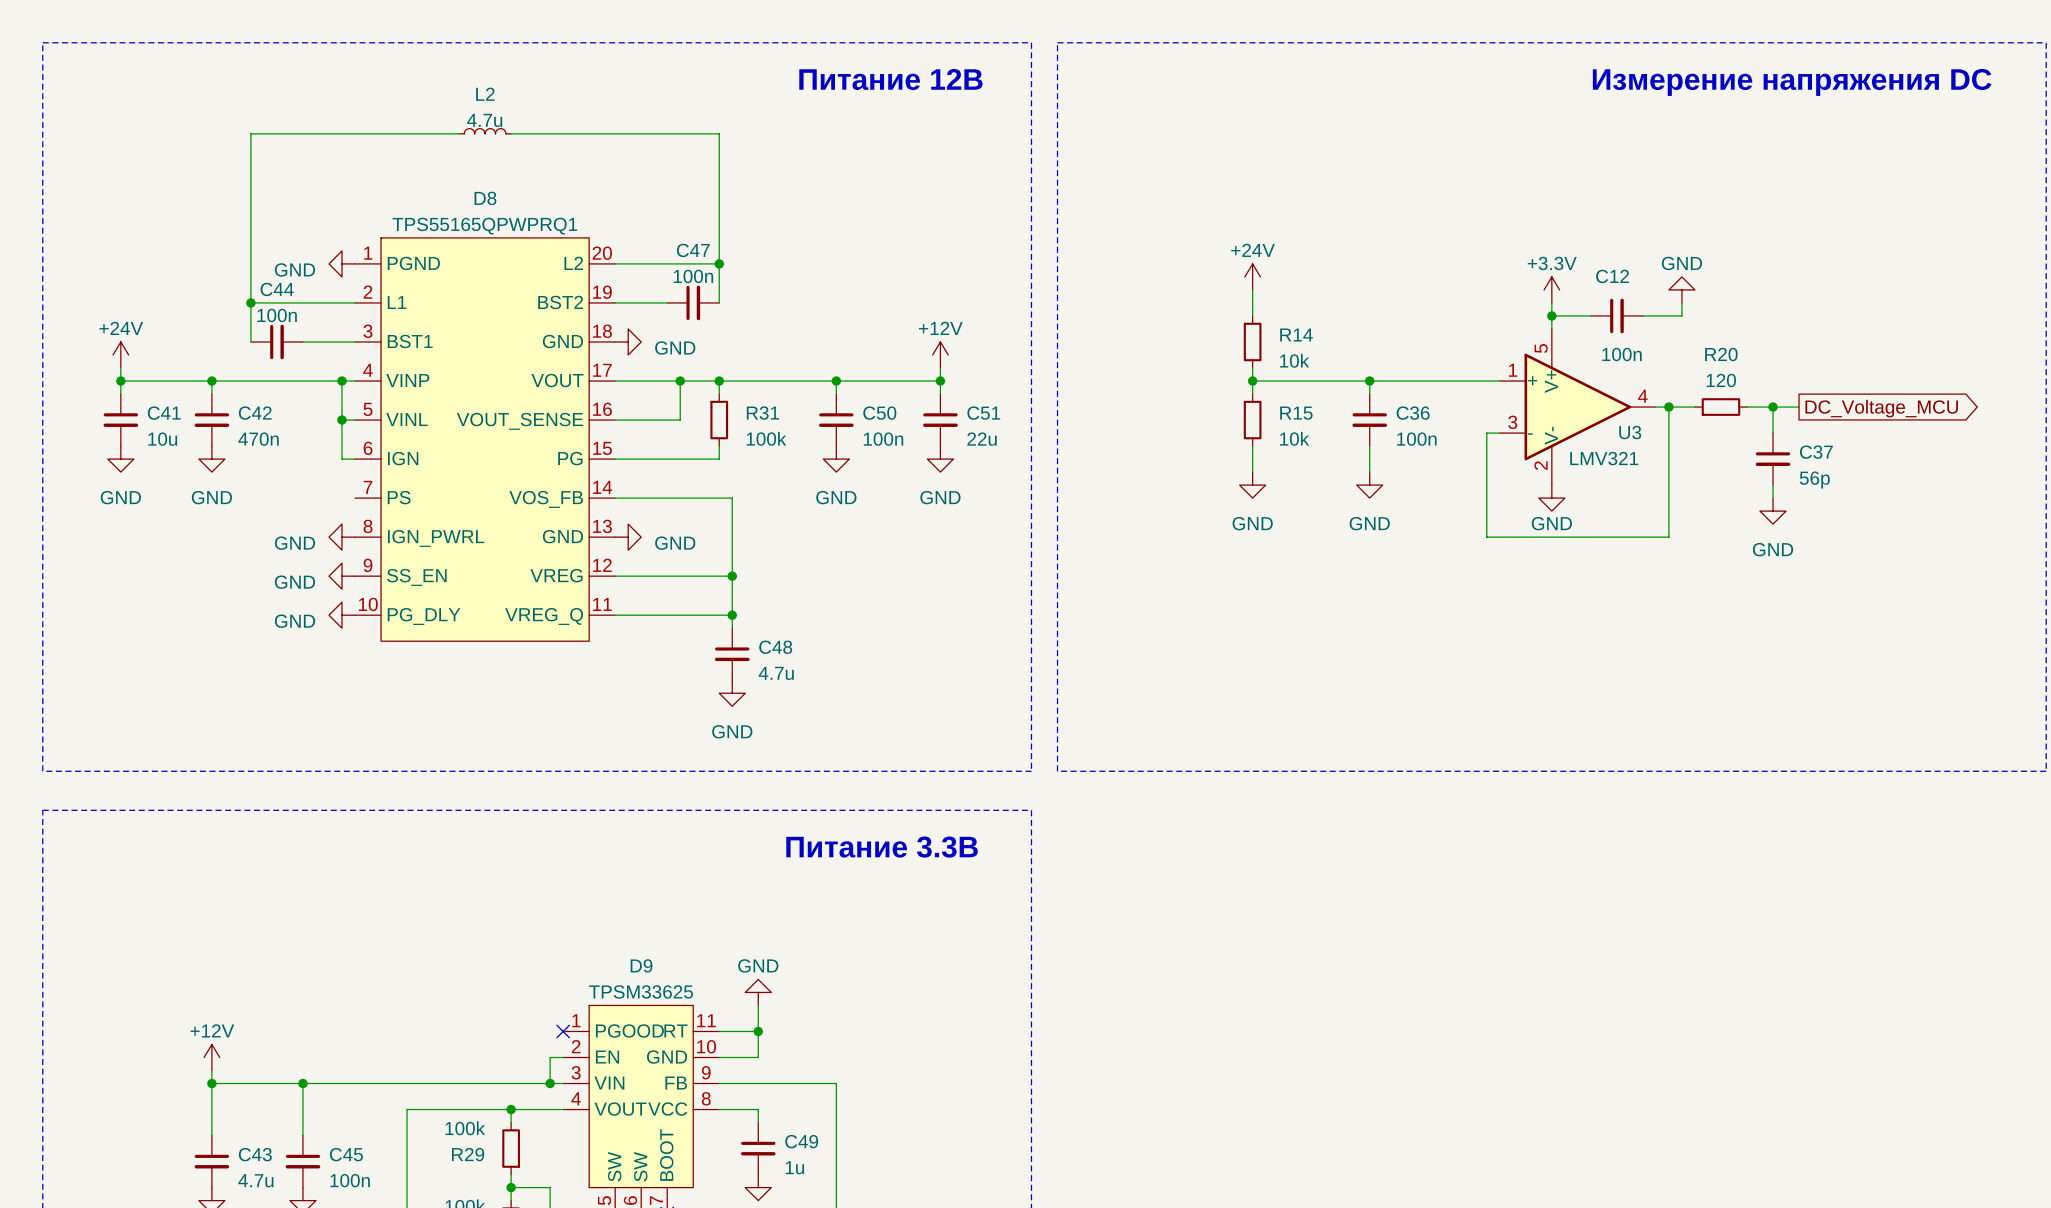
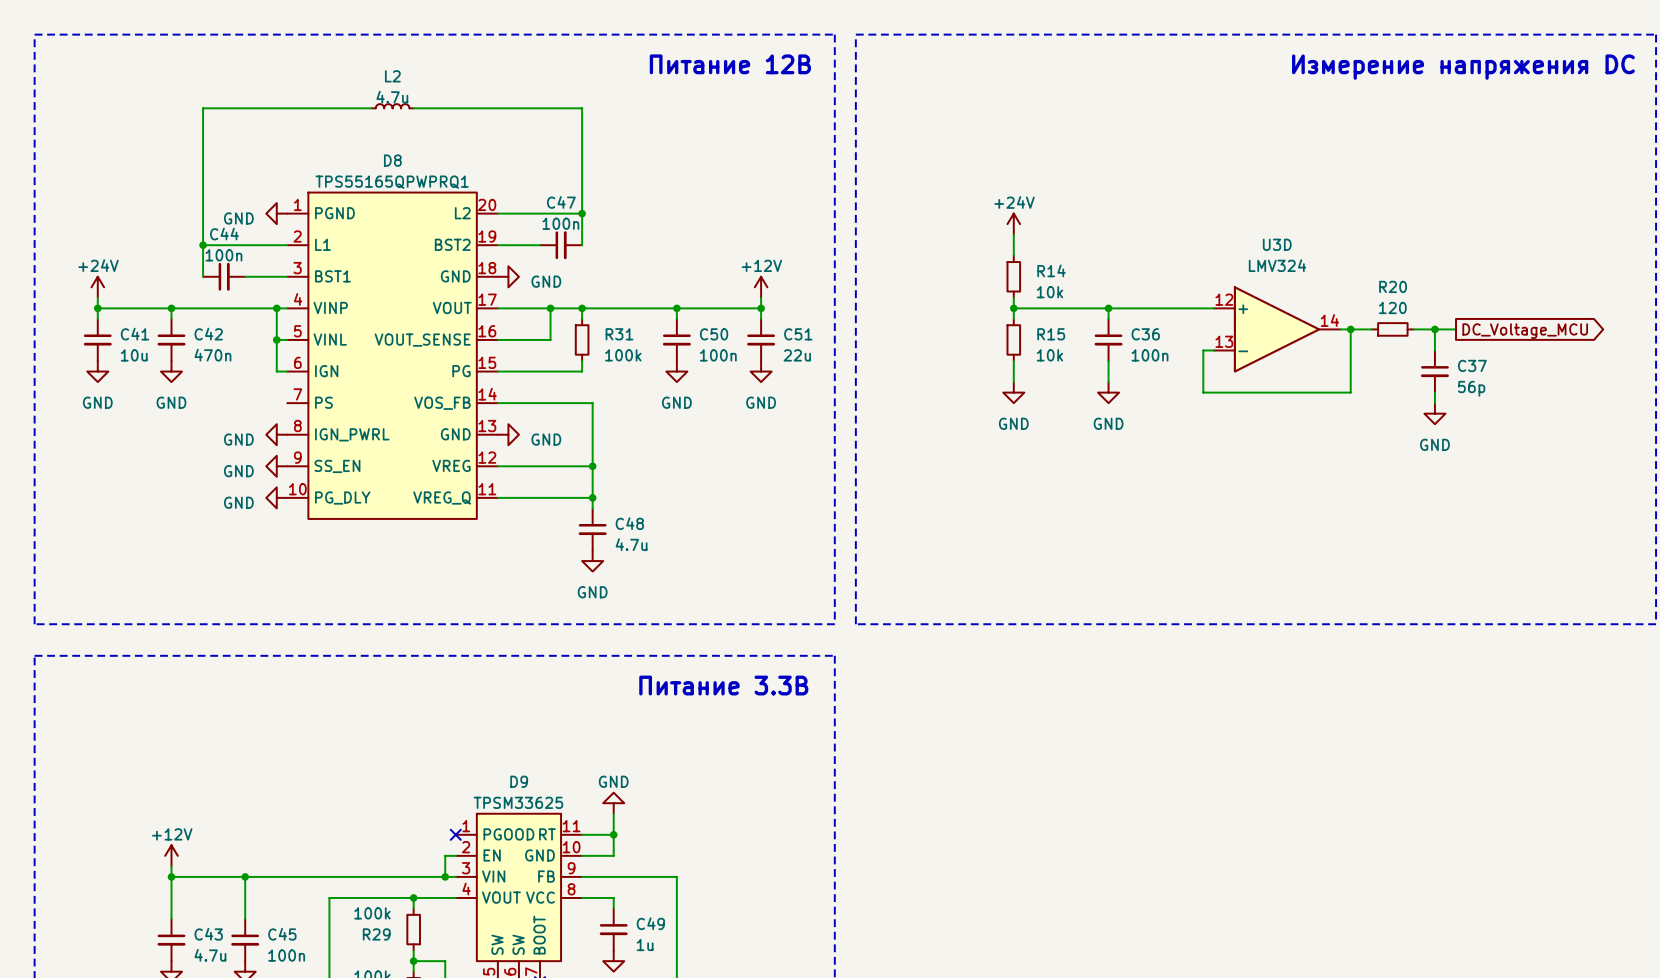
power symbol: +3.3V (1551, 289) -> none
power symbol: GND (1681, 289) -> none
wire: (1551, 302) (1551, 328) -> none
wire: (1681, 302) (1681, 315) (1642, 315) -> none
wire: (1551, 315) (1590, 315) -> none
junction: (1551, 315) -> none
C12: 100n (1616, 315) -> none
U3: LMV321 (1577, 407) -> none
U3D: none -> LMV324 (1277, 329)
wire: (1486, 485) (1486, 537) (1668, 537) (1668, 485) -> (1203, 392) (1350, 392)
power symbol: GND (1551, 498) -> none

